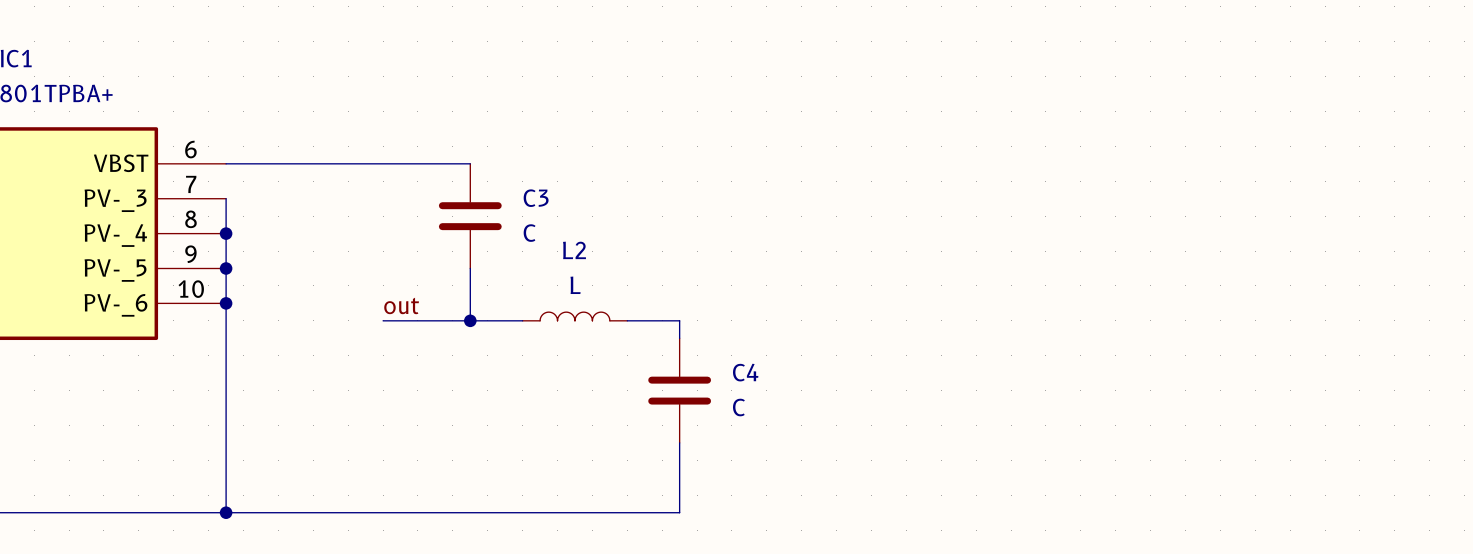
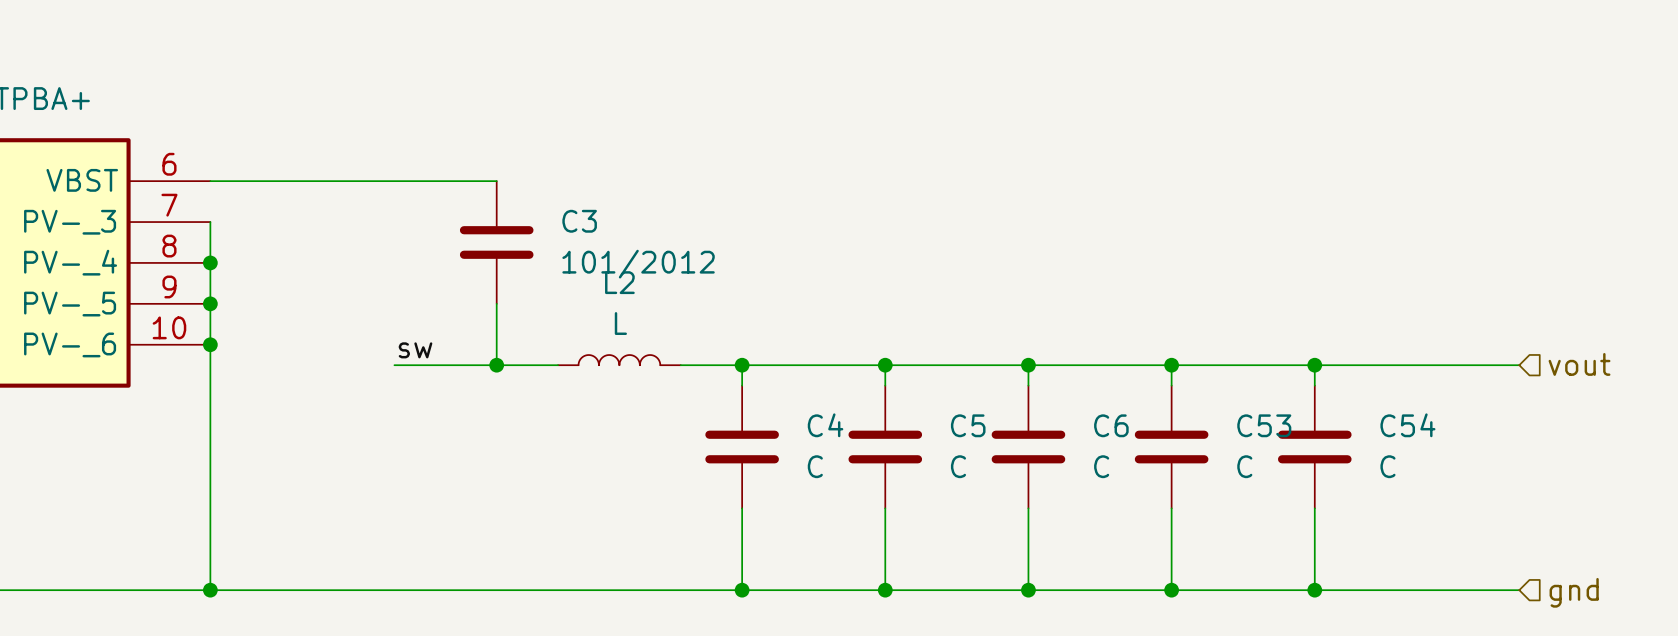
C3 value: C (529, 233) -> 101/2012 (638, 264)
label: out (401, 305) -> sw (415, 350)
wire: none -> (742, 365) (1519, 365)
junction: none -> (742, 365)
wire: none -> (885, 365) (885, 385)
junction: none -> (885, 365)
wire: none -> (1028, 365) (1028, 385)
junction: none -> (1028, 365)
wire: none -> (1171, 365) (1171, 385)
junction: none -> (1171, 365)
wire: none -> (1314, 365) (1314, 385)
junction: none -> (1314, 365)
hierarchical label: none -> vout (1579, 364)
C5: none -> C (885, 447)
C6: none -> C (1028, 447)
C53: none -> C (1171, 447)
C54: none -> C (1314, 447)
wire: none -> (885, 508) (885, 590)
wire: none -> (1028, 508) (1028, 590)
wire: none -> (1171, 508) (1171, 590)
wire: none -> (1314, 508) (1314, 590)
wire: none -> (742, 590) (1519, 590)
junction: none -> (742, 590)
junction: none -> (885, 590)
junction: none -> (1028, 590)
junction: none -> (1171, 590)
junction: none -> (1314, 590)
hierarchical label: none -> gnd (1574, 592)

